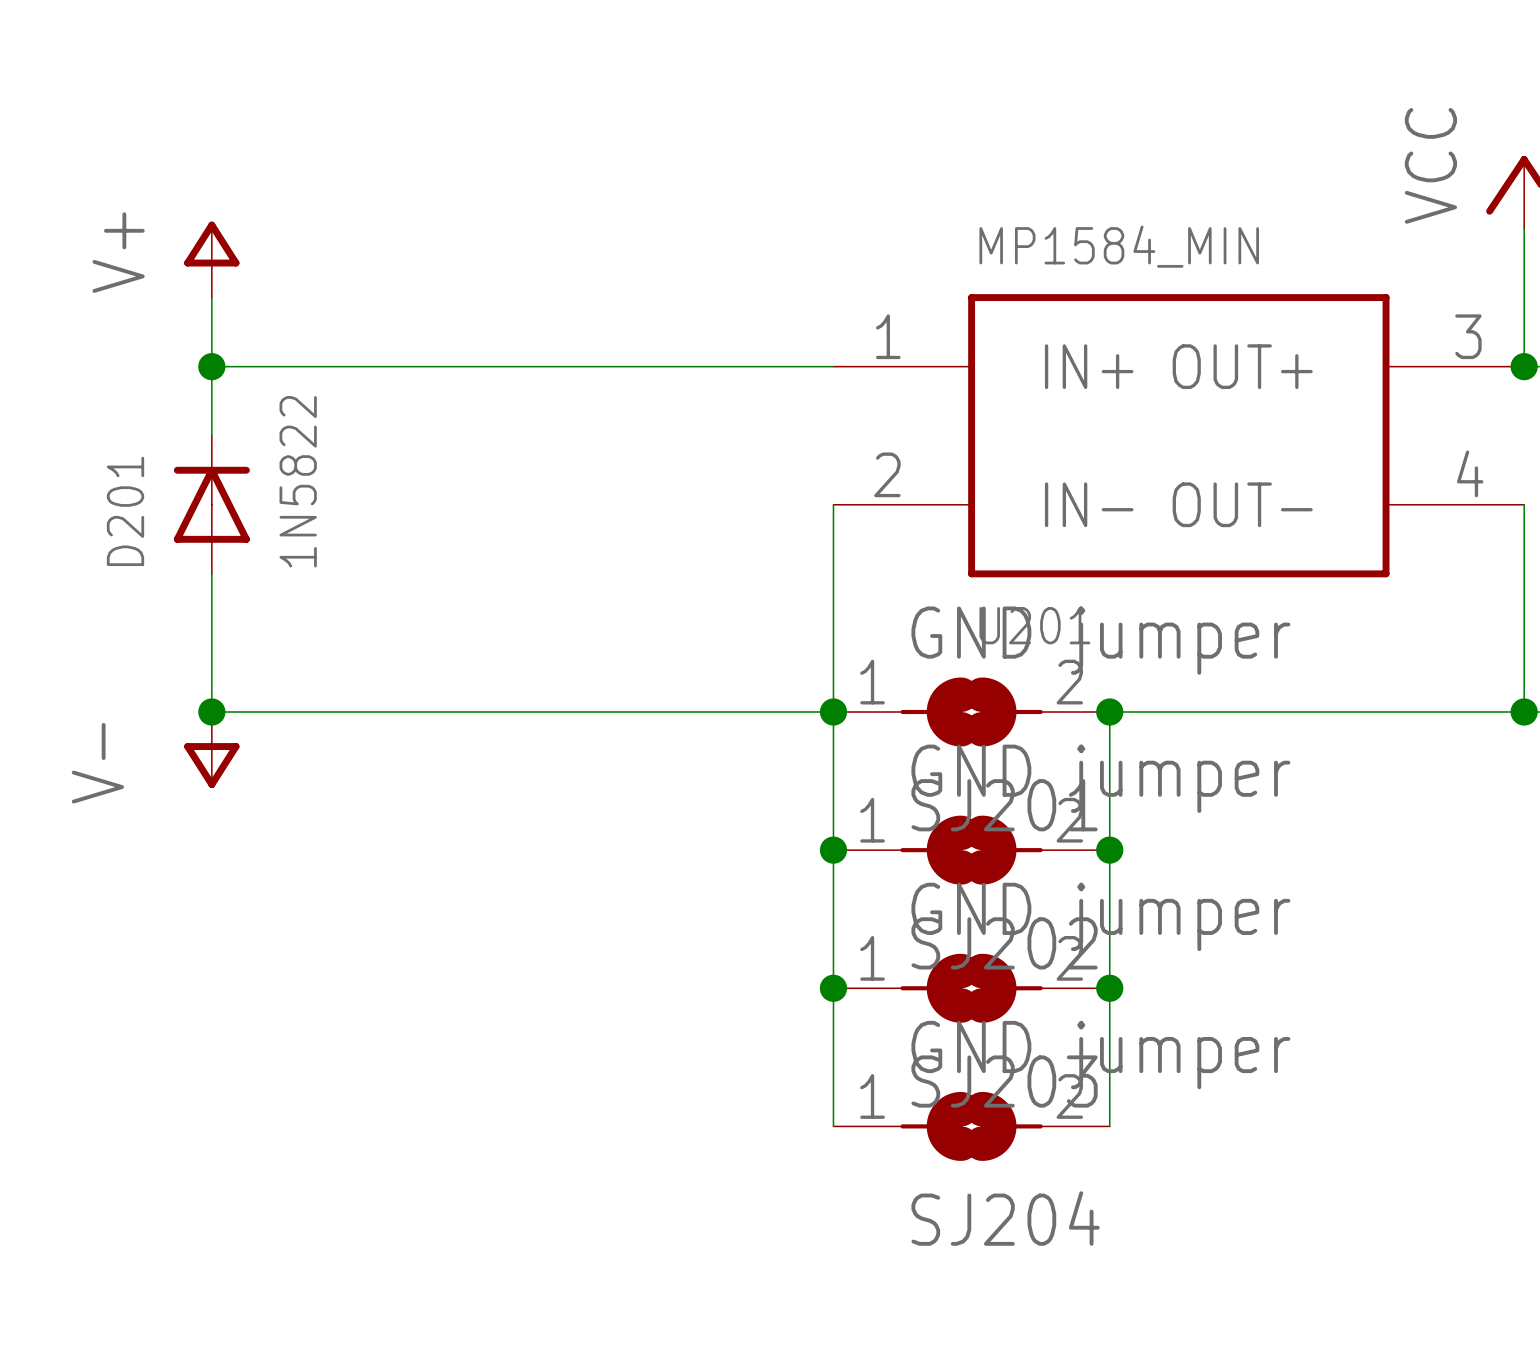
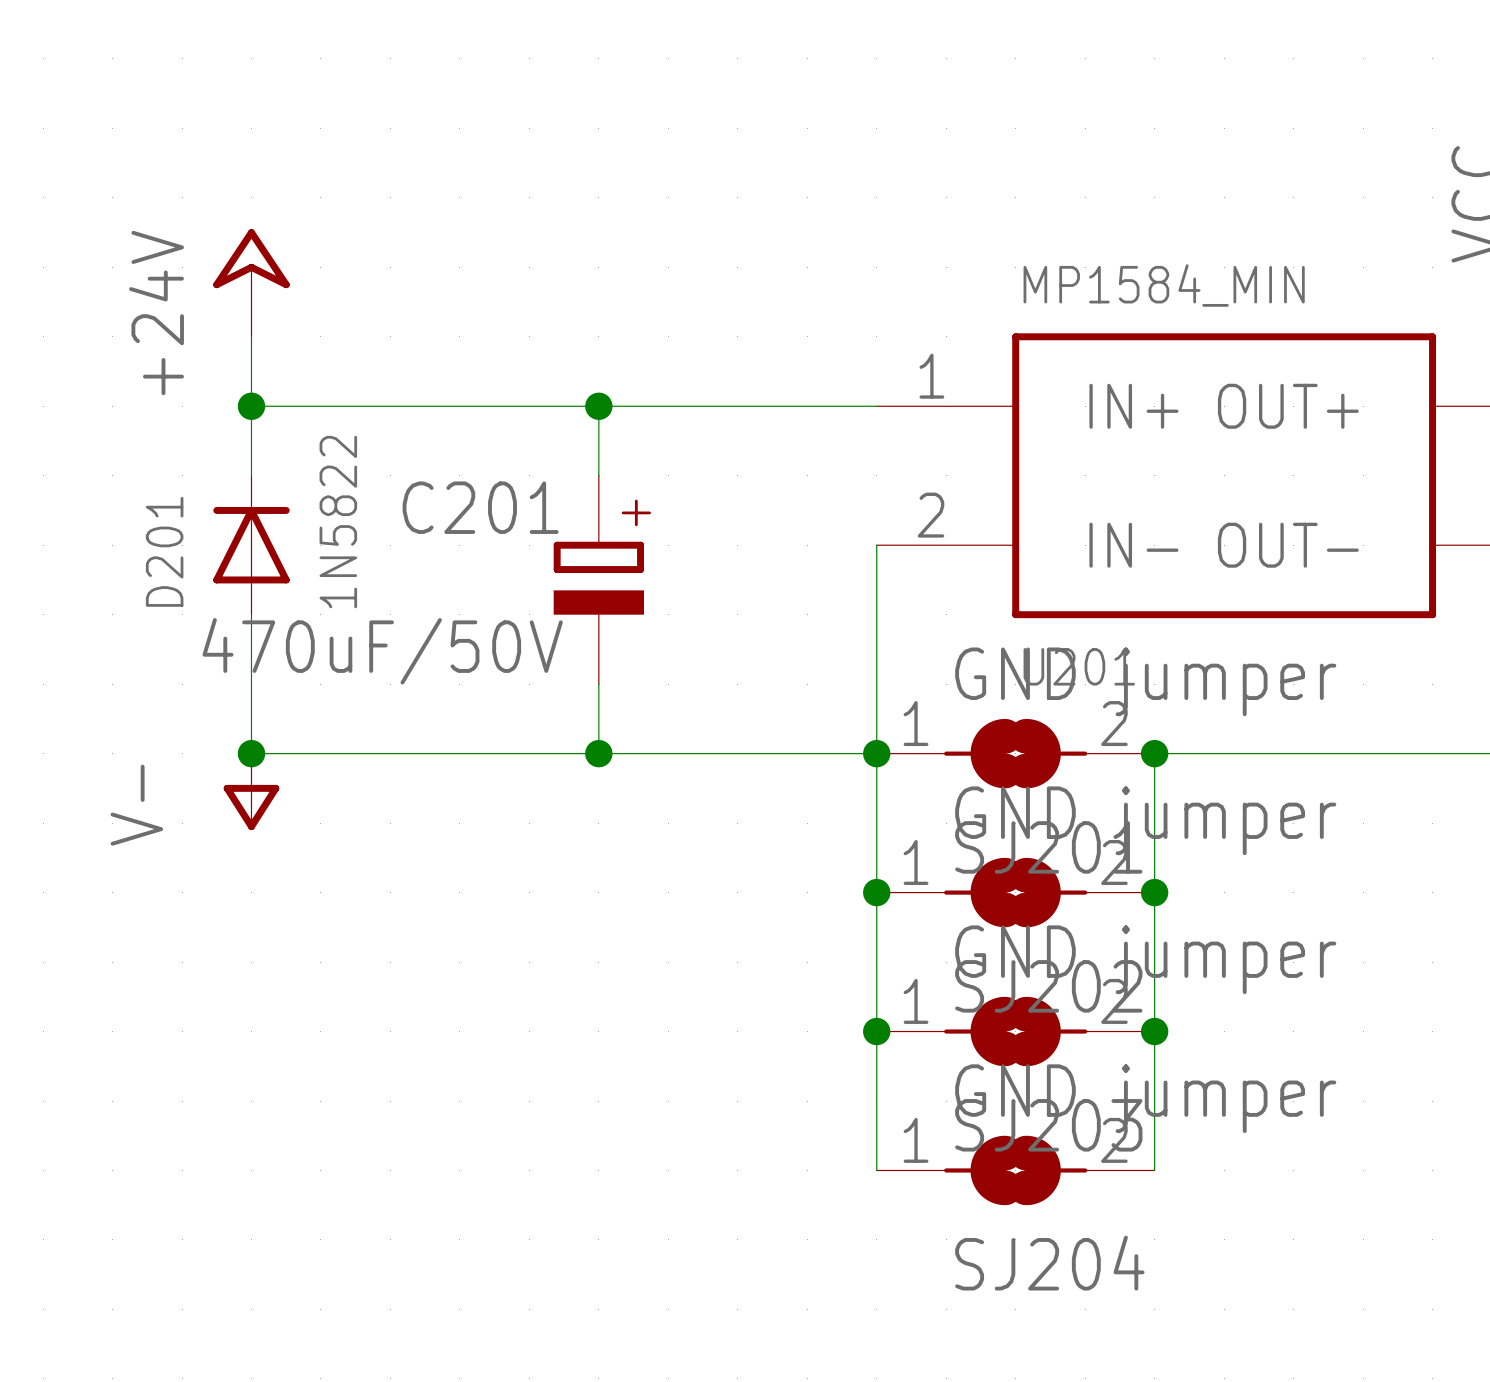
power symbol: V+ (211, 259) -> +24V (251, 282)
wire: none -> (598, 406) (598, 475)
junction: none -> (598, 406)
C201: none -> 470uF/50V (598, 579)
wire: none -> (598, 684) (598, 753)
junction: none -> (598, 753)

